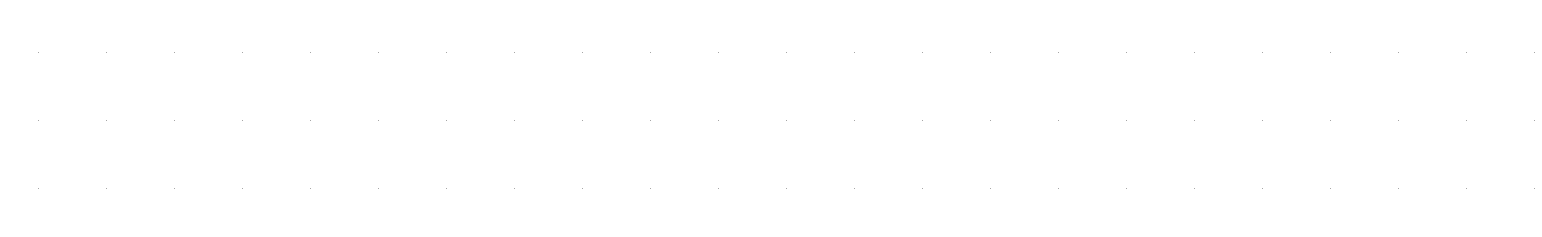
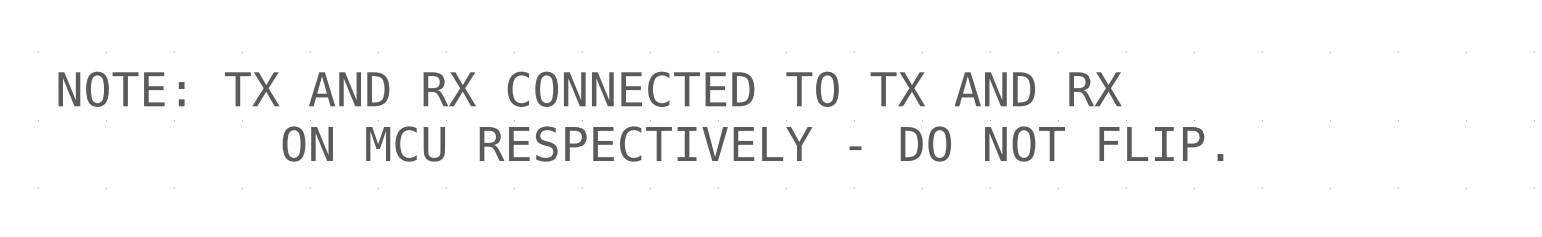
text: none -> NOTE: TX AND RX CONNECTED TO TX AND RX (590, 89)
text: none -> ON MCU RESPECTIVELY - DO NOT FLIP. (752, 144)

